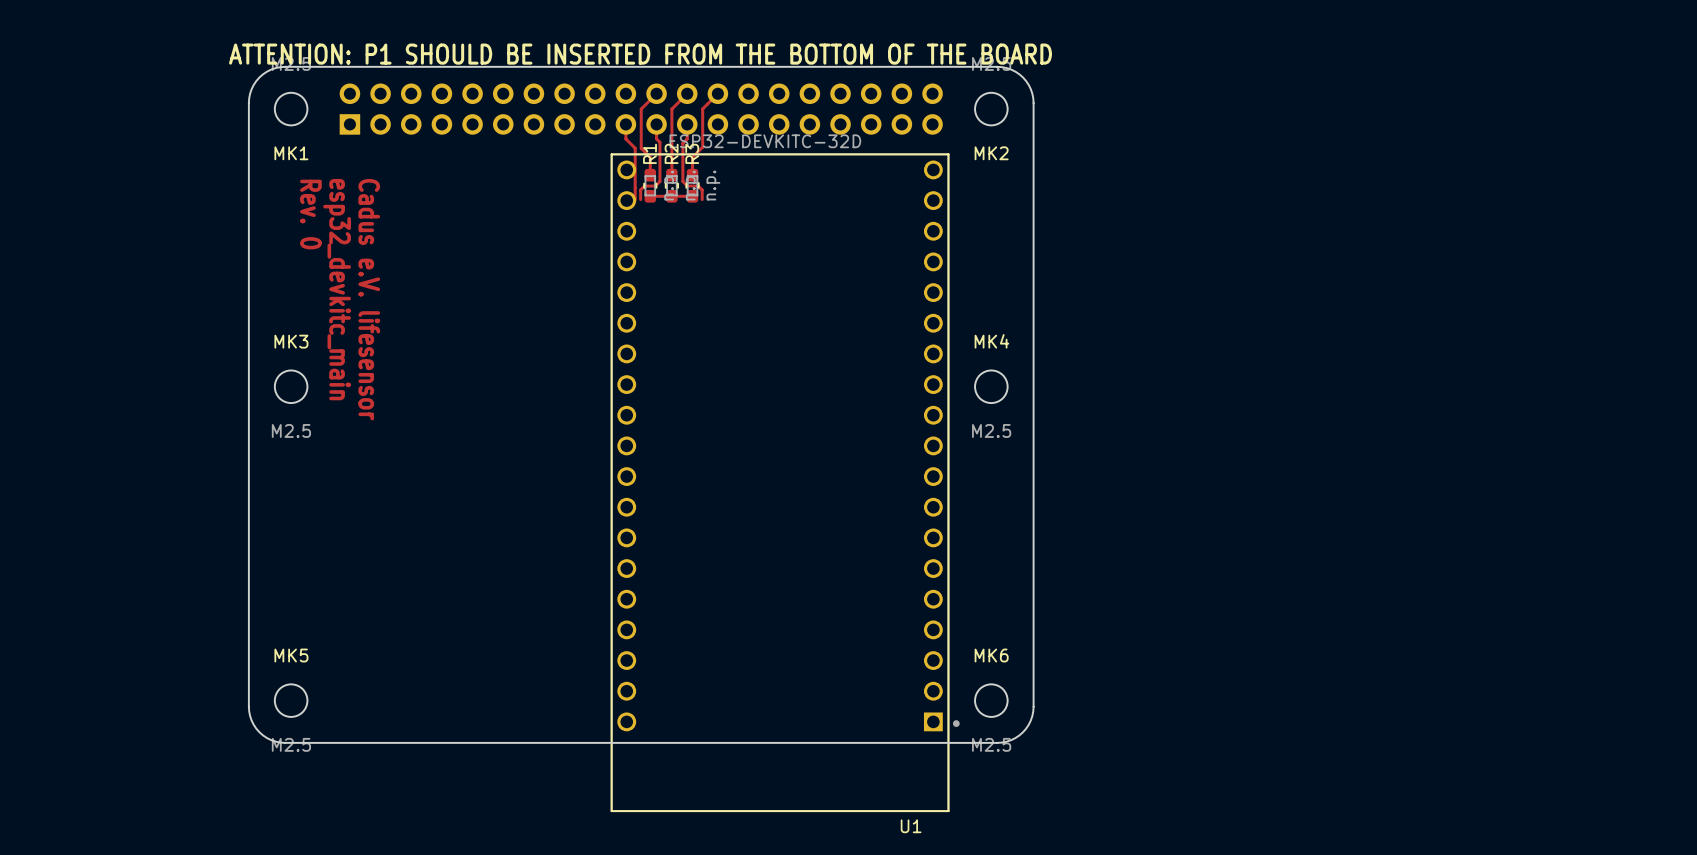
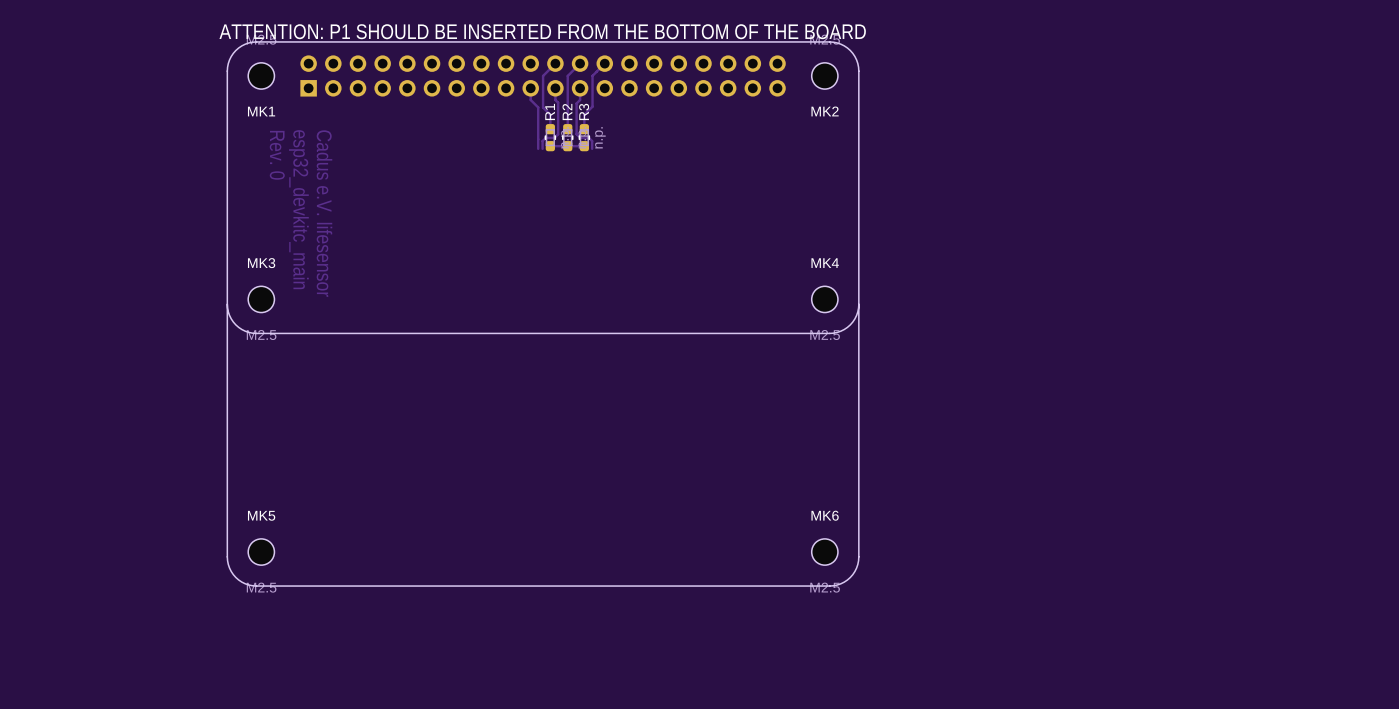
board edge: none -> (227, 304) (229, 315) (235, 324) (245, 331) (256, 333) (829, 333) (840, 331) (850, 324) (856, 315) (858, 304)
U1: ESP32-DEVKITC-32D (785, 482) -> none

